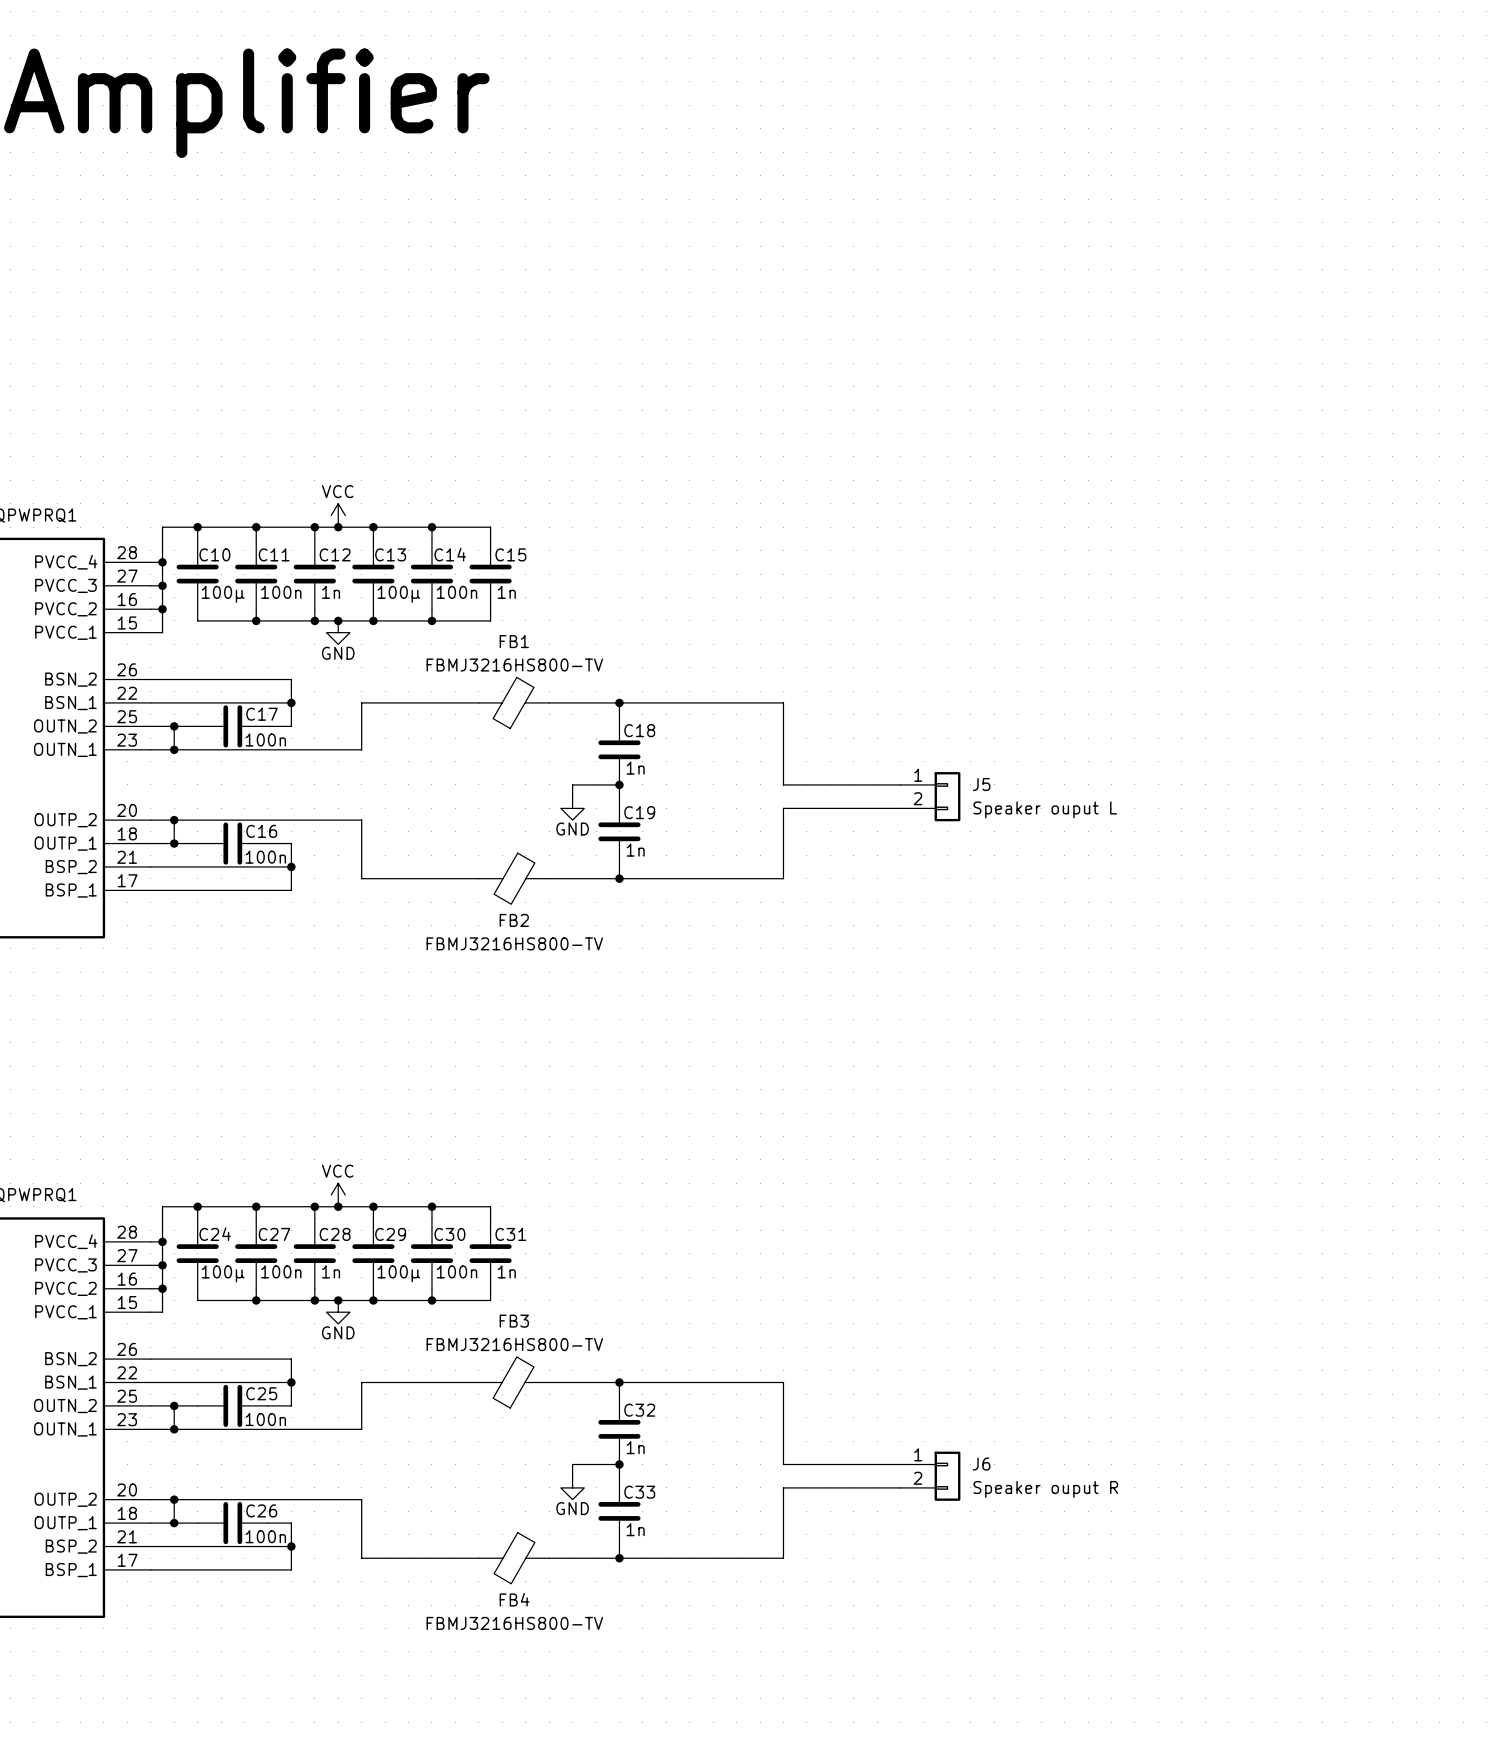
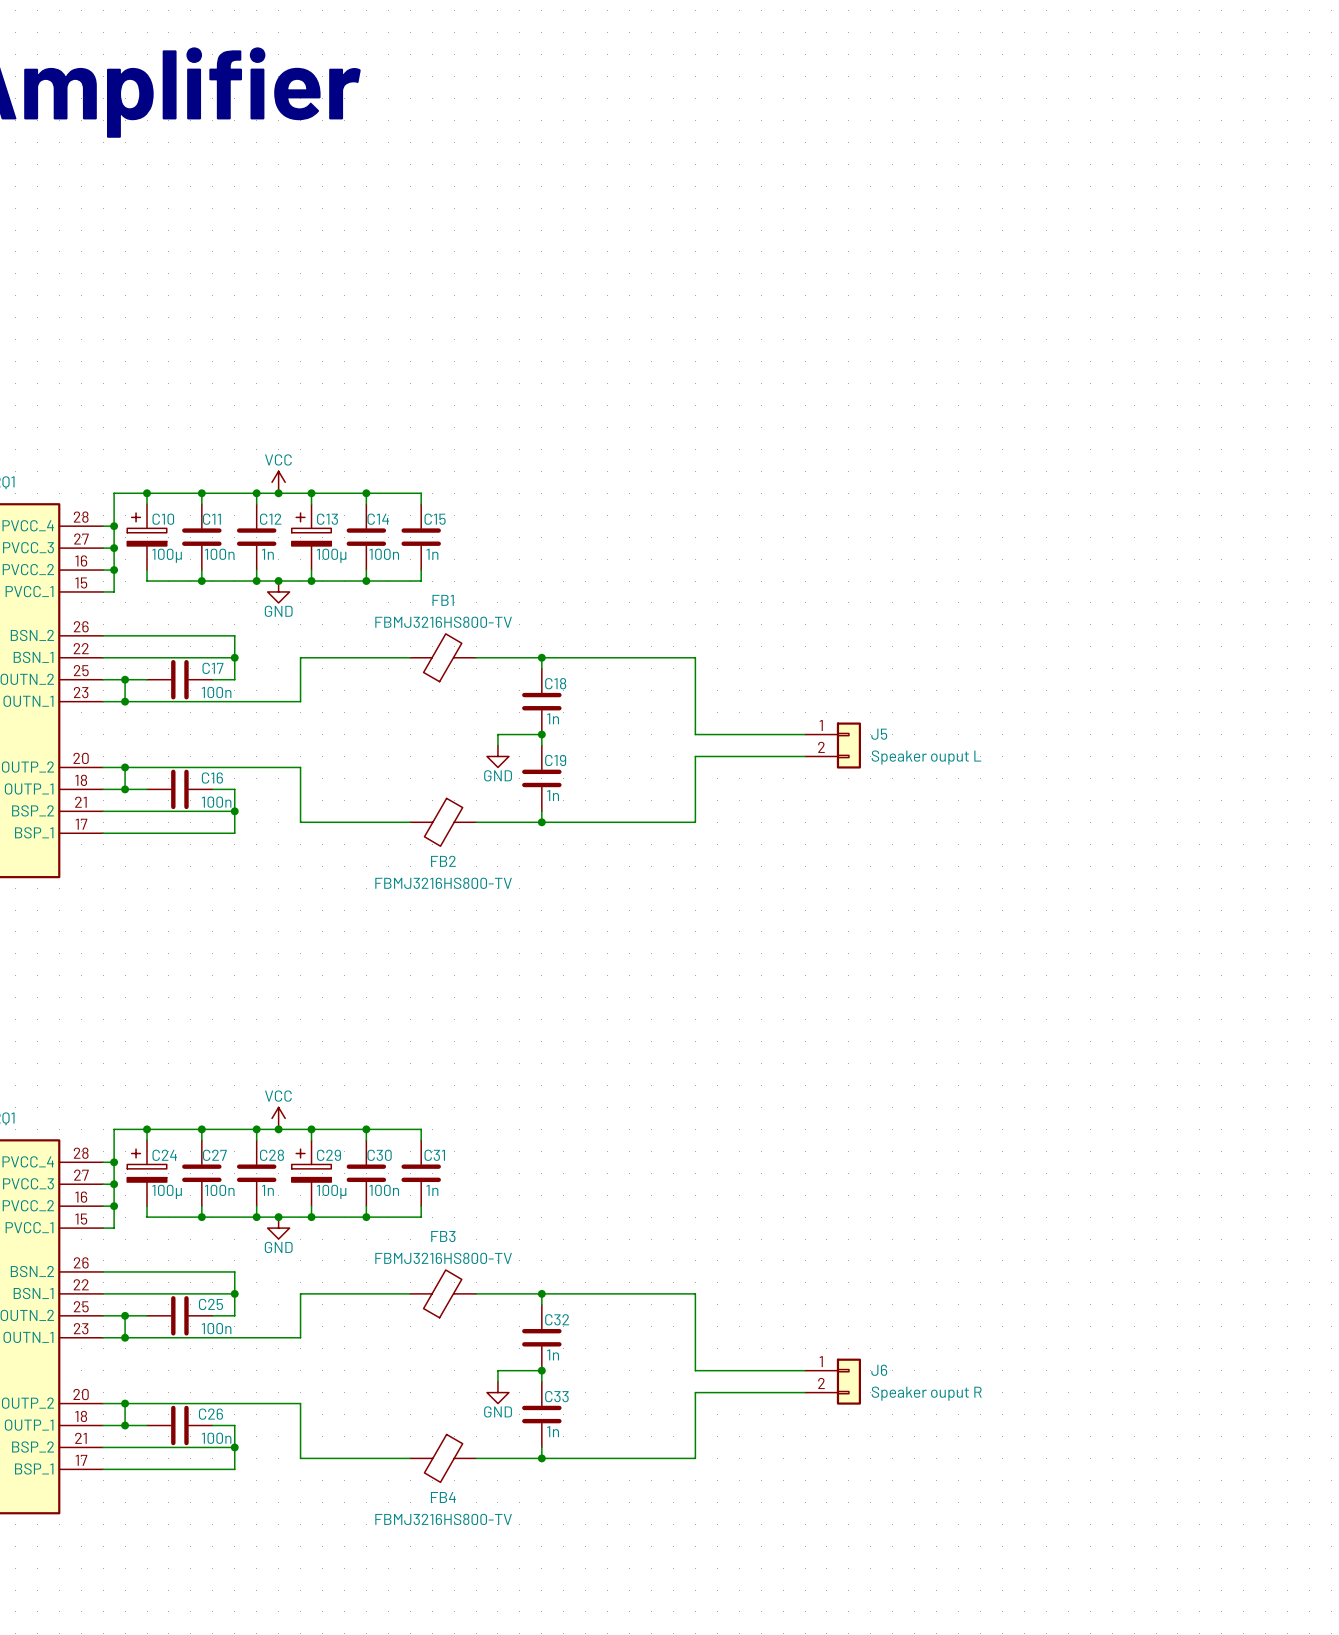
C10 symbol: [176, 538, 219, 610] -> [127, 504, 167, 571]
C13 symbol: [352, 538, 395, 610] -> [291, 504, 332, 571]
C24 symbol: [176, 1218, 219, 1289] -> [127, 1140, 167, 1207]
C29 symbol: [352, 1218, 395, 1289] -> [291, 1140, 332, 1207]

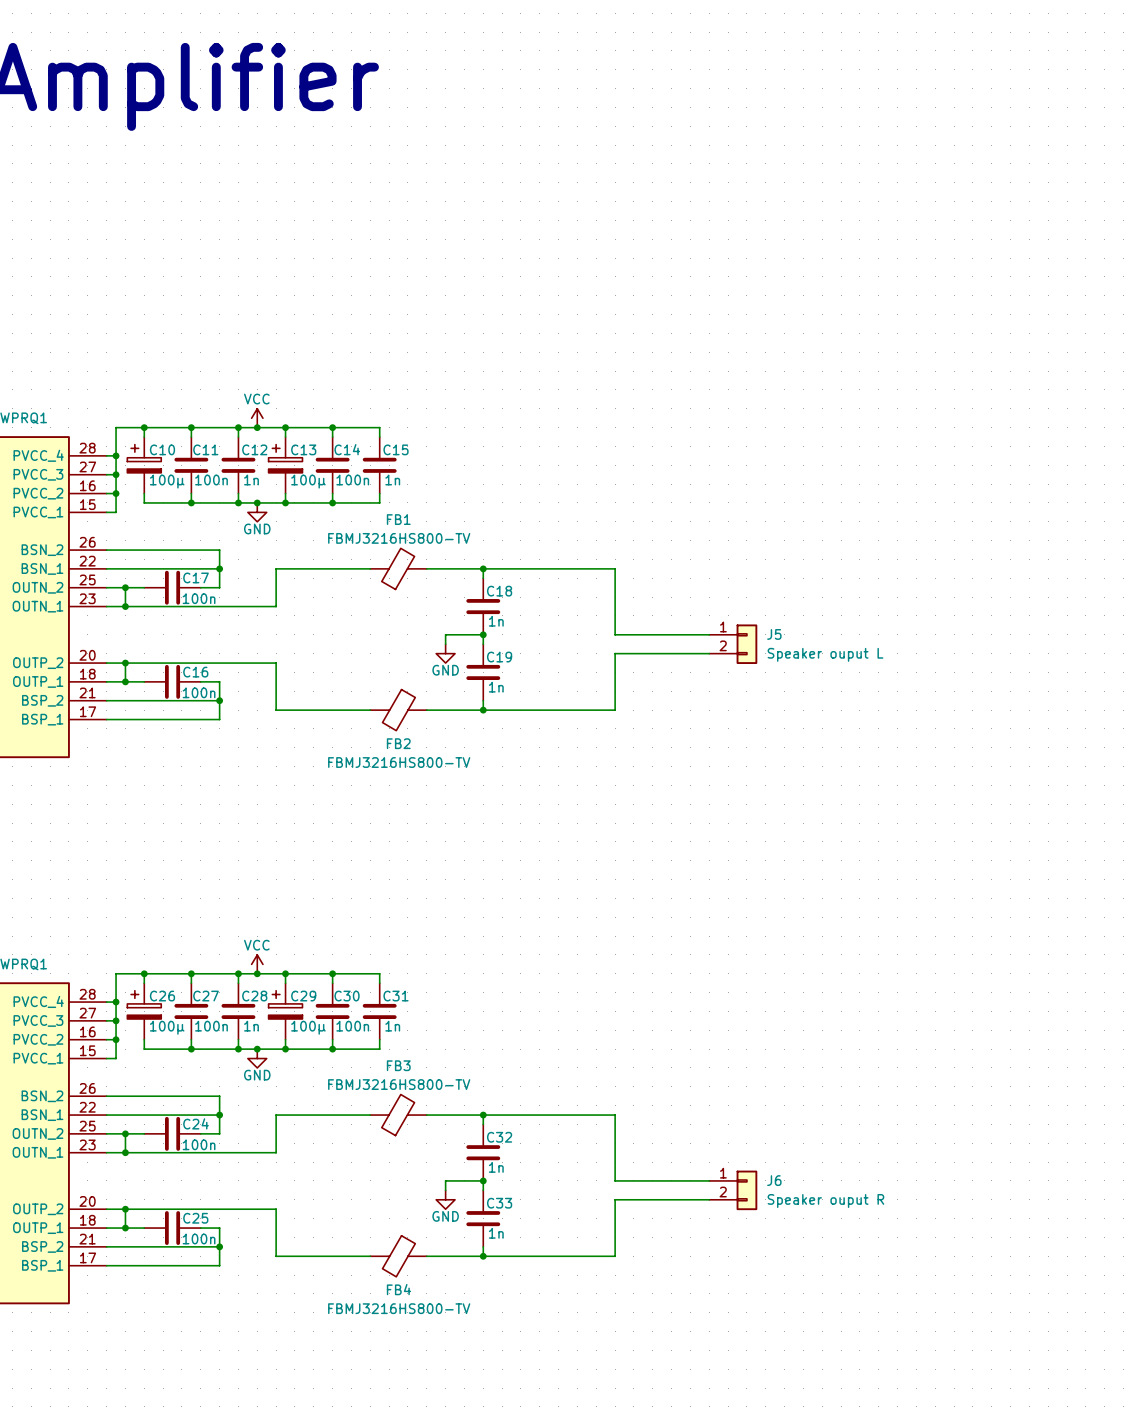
C24 name: C24 (164, 1155) -> C26 (162, 996)
C25 name: C25 (210, 1304) -> C24 (196, 1123)
C26 name: C26 (210, 1414) -> C25 (195, 1218)

